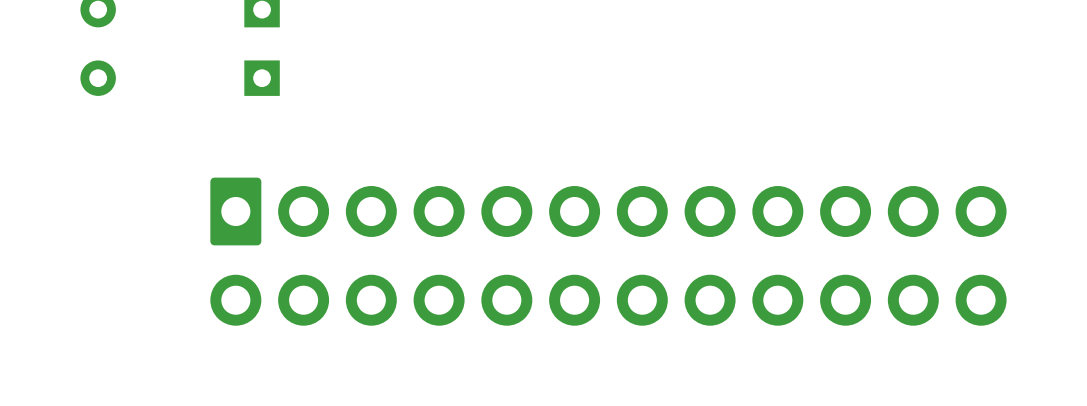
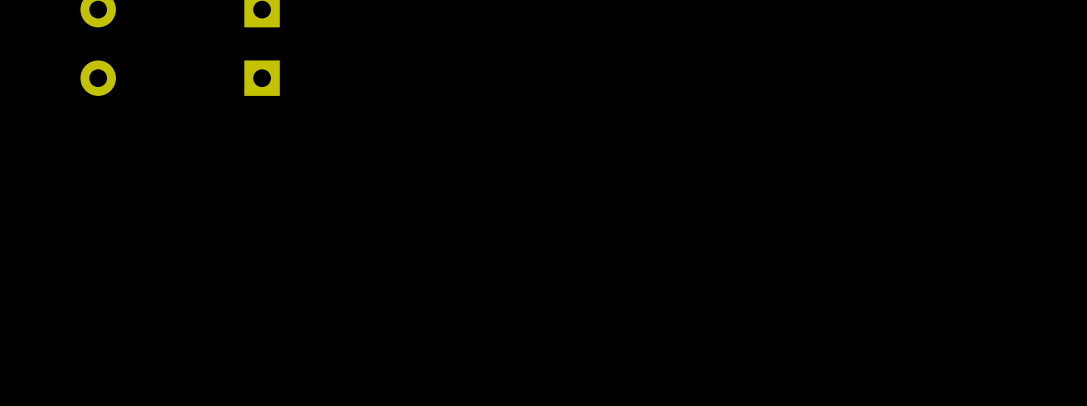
part: (608, 251) -> none

